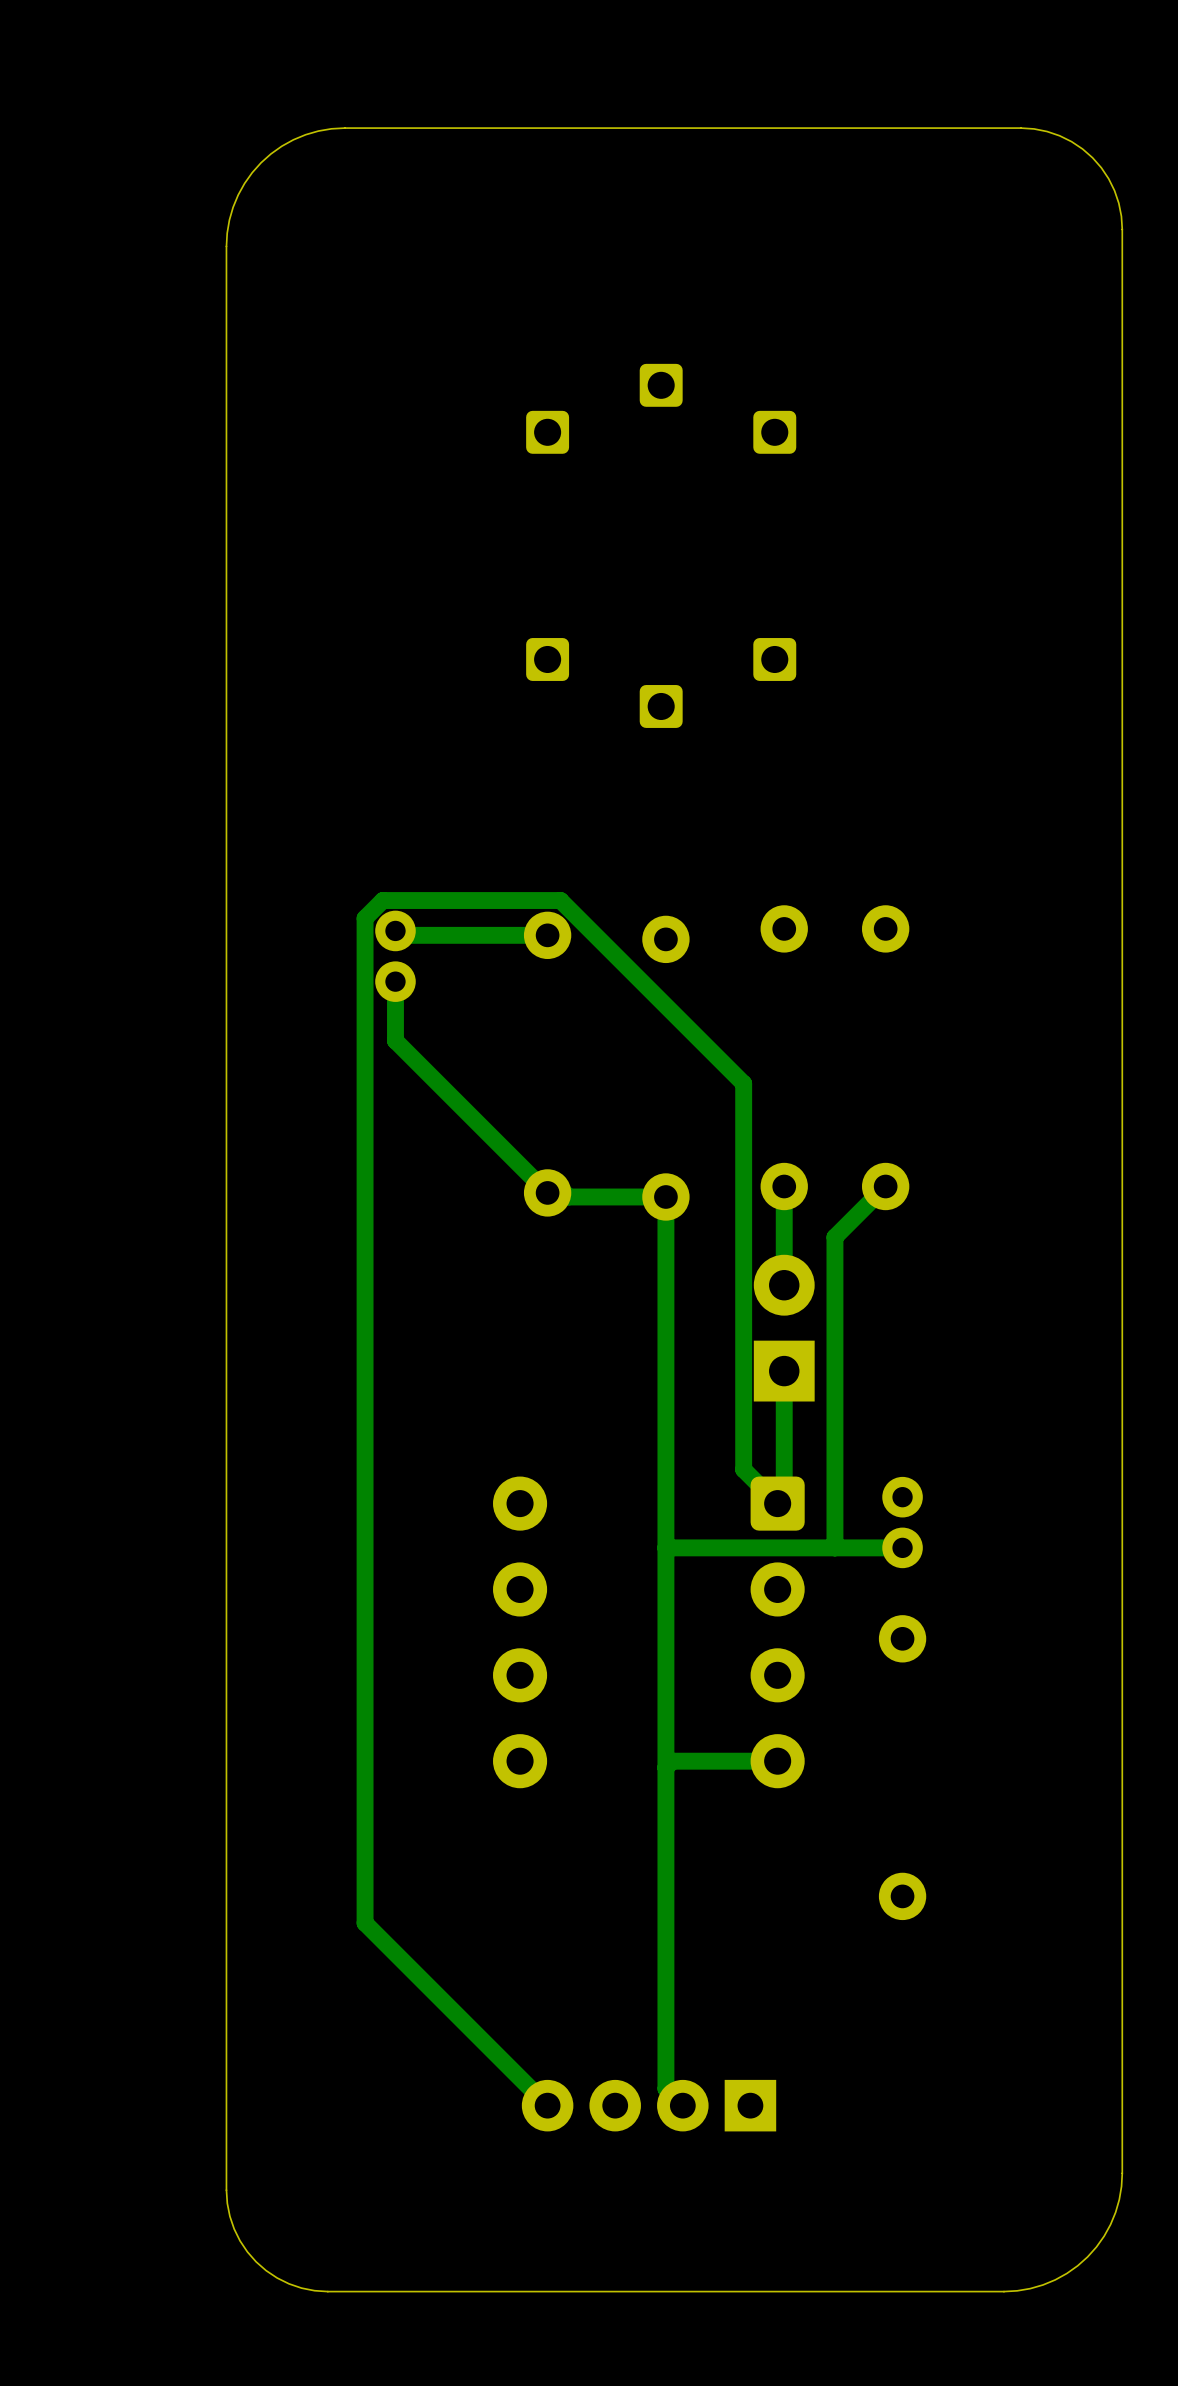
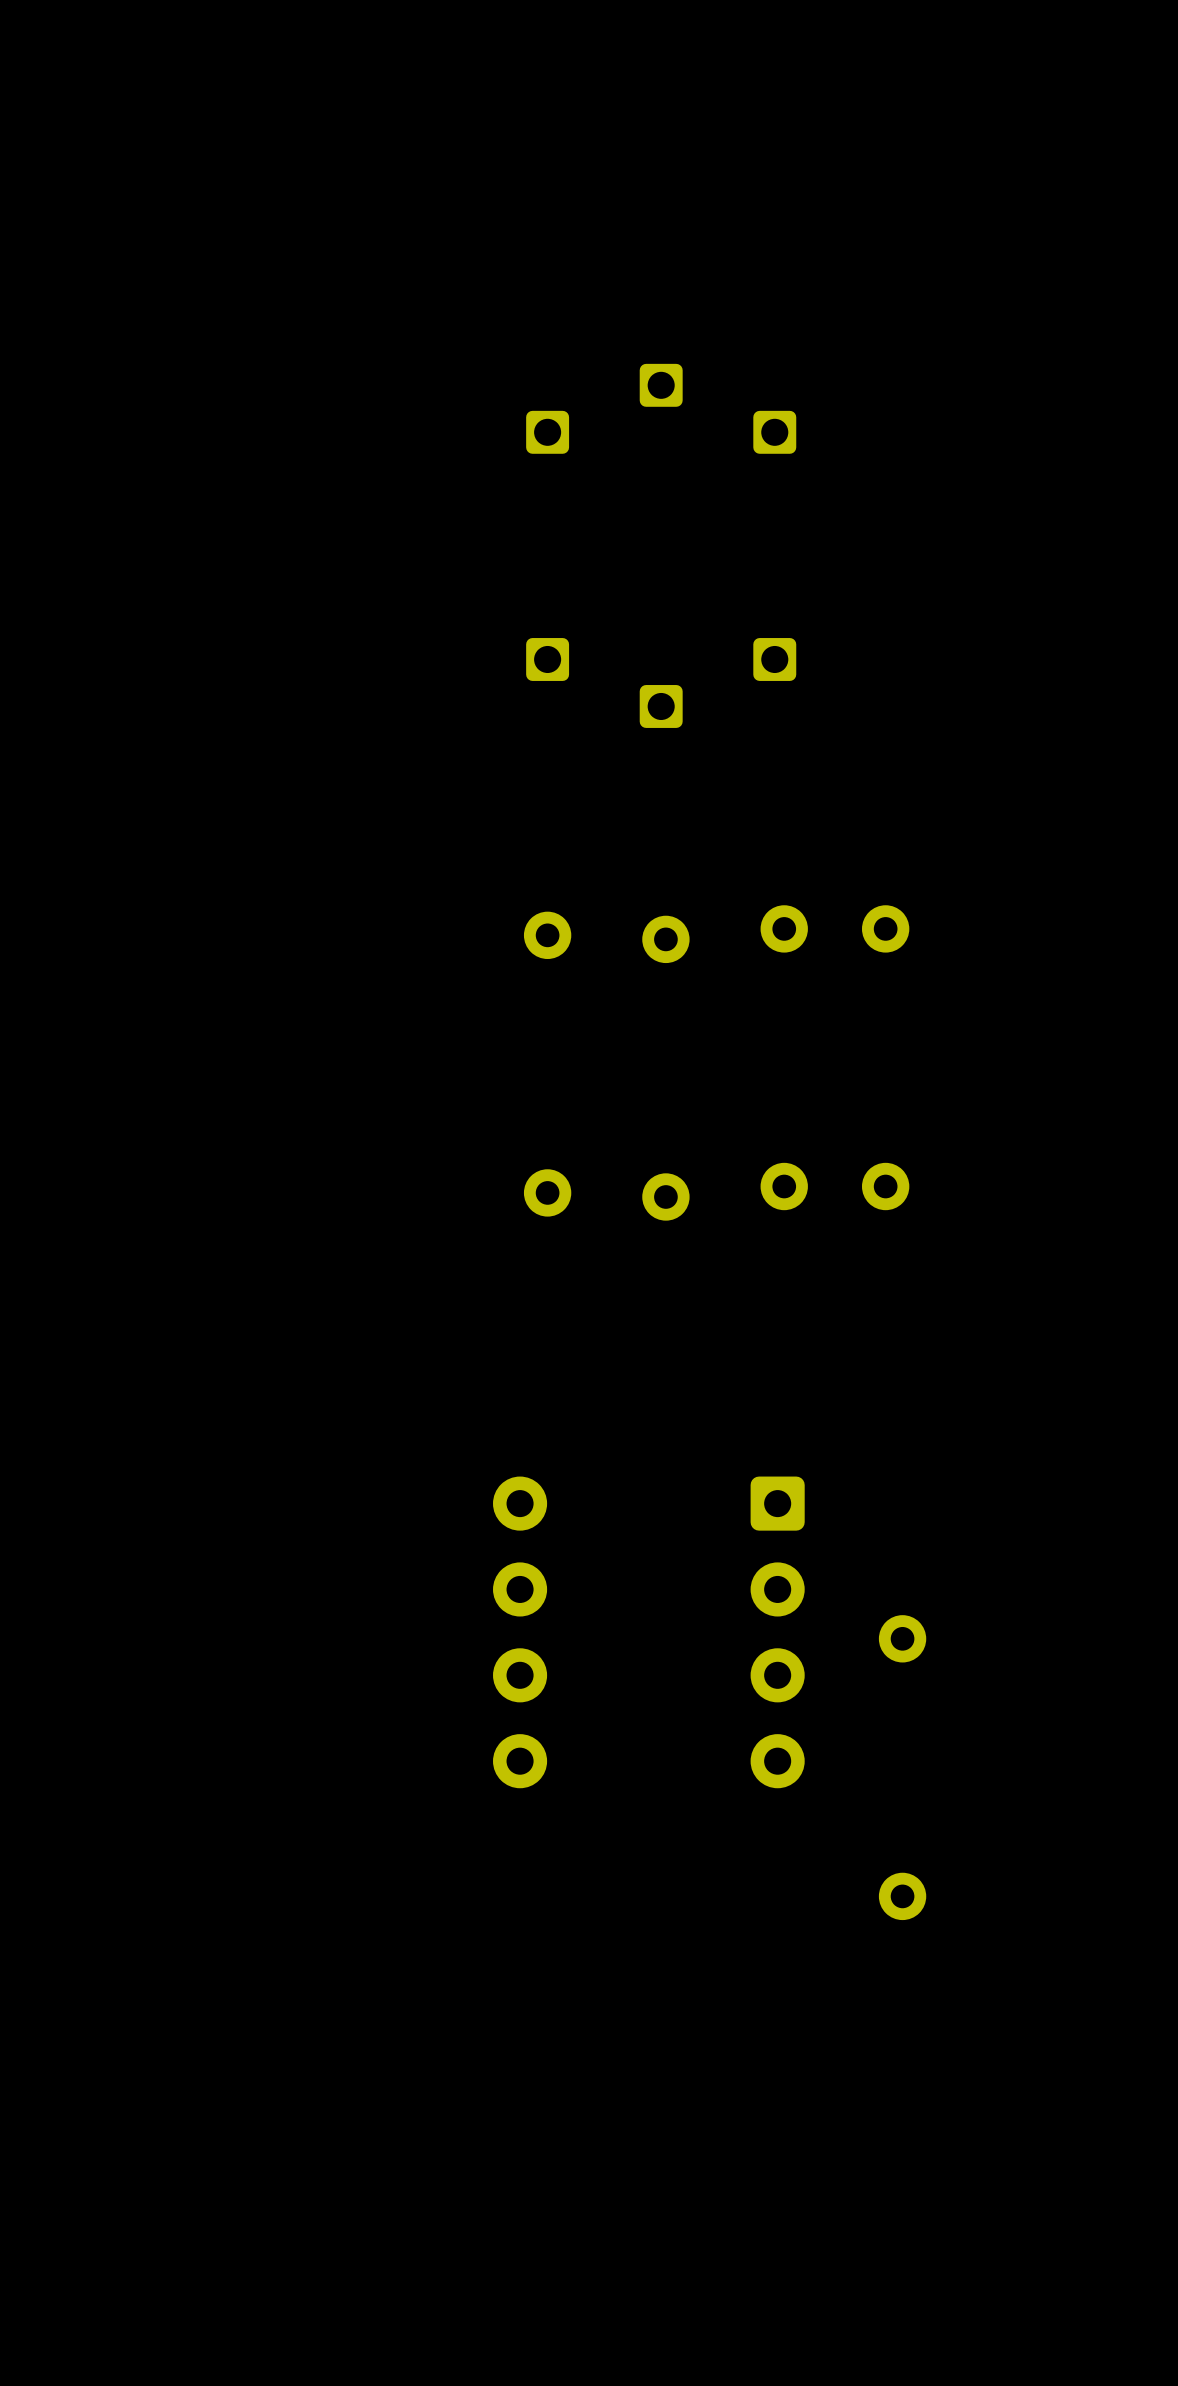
board edge: (1020, 128) (331, 128) (293, 139) (271, 153) (244, 183) (233, 207) (226, 246) (226, 2190) (229, 2216) (240, 2240) (247, 2251) (256, 2261) (277, 2277) (301, 2288) (327, 2291) (1017, 2290) (1055, 2279) (1077, 2265) (1096, 2247) (1115, 2212) (1122, 2173) (1122, 229) (1118, 203) (1114, 190) (1101, 167) (1092, 157) (1071, 141) (1059, 135) (1047, 131) (1020, 128) -> none
track: (395, 930) (399, 935) (547, 935) -> none
part: (395, 956) -> none
track: (395, 981) (395, 1040) (547, 1192) (564, 1192) (568, 1196) (665, 1196) (665, 2088) (682, 2105) -> none
track: (784, 1186) (784, 1285) -> none
track: (885, 1186) (834, 1237) (834, 1547) -> none
part: (784, 1328) -> none
track: (784, 1371) (784, 1497) (777, 1503) (743, 1469) (743, 1083) (560, 900) (382, 900) (365, 918) (365, 1923) (547, 2105) -> none
part: (902, 1522) -> none
track: (902, 1547) (665, 1547) -> none
track: (777, 1761) (672, 1761) (665, 1767) -> none
part: (649, 2105) -> none

